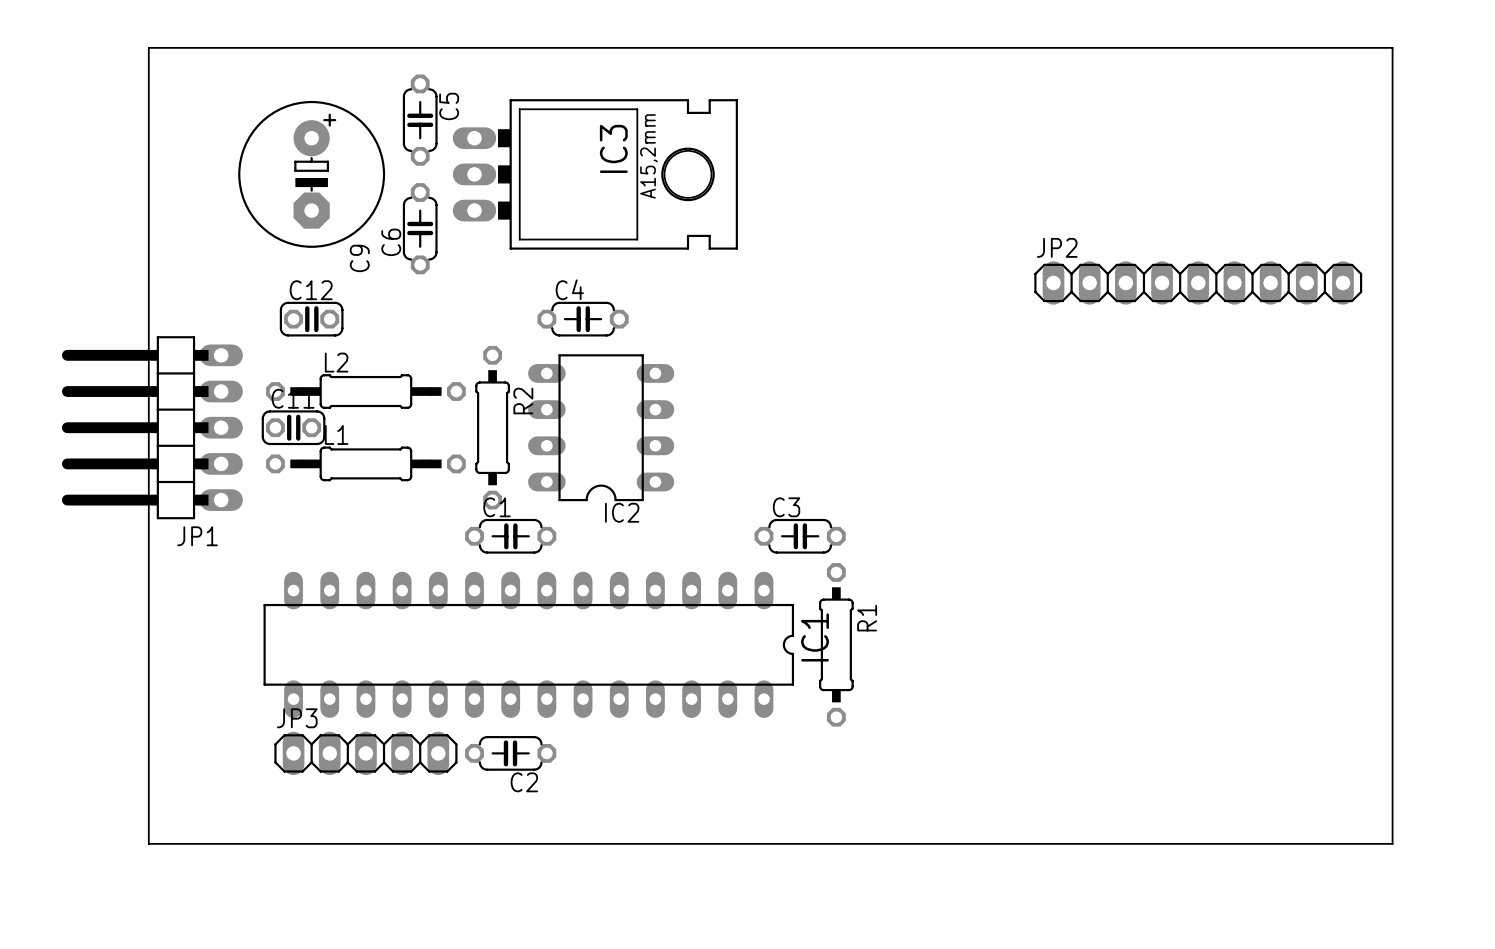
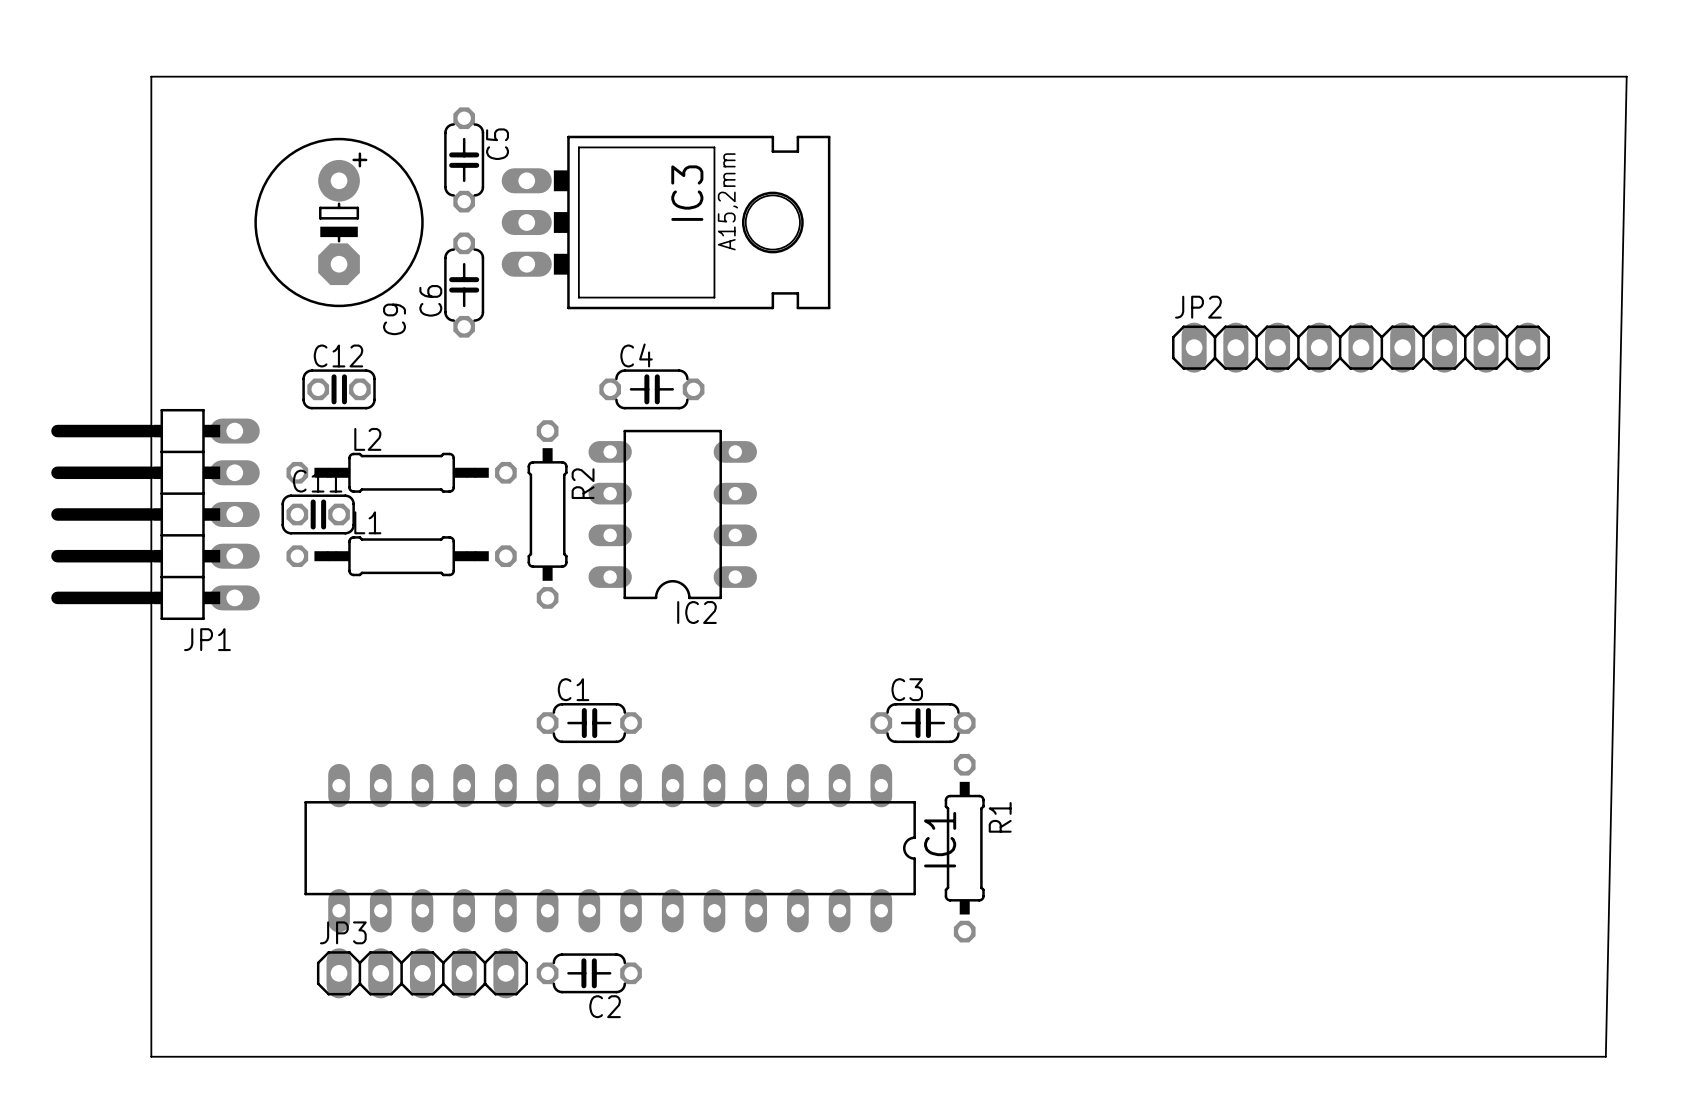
board edge: (1392, 47) (1392, 843) (148, 843) -> (1584, 76) (1626, 76) (1605, 1056) (151, 1056) (151, 994)
C1 position: (510, 536) -> (589, 723)
C3 position: (800, 536) -> (923, 723)
IC1 position: (528, 644) -> (610, 848)
R1 position: (836, 644) -> (964, 848)
JP3 position: (365, 753) -> (422, 973)
C2 position: (510, 753) -> (589, 973)

